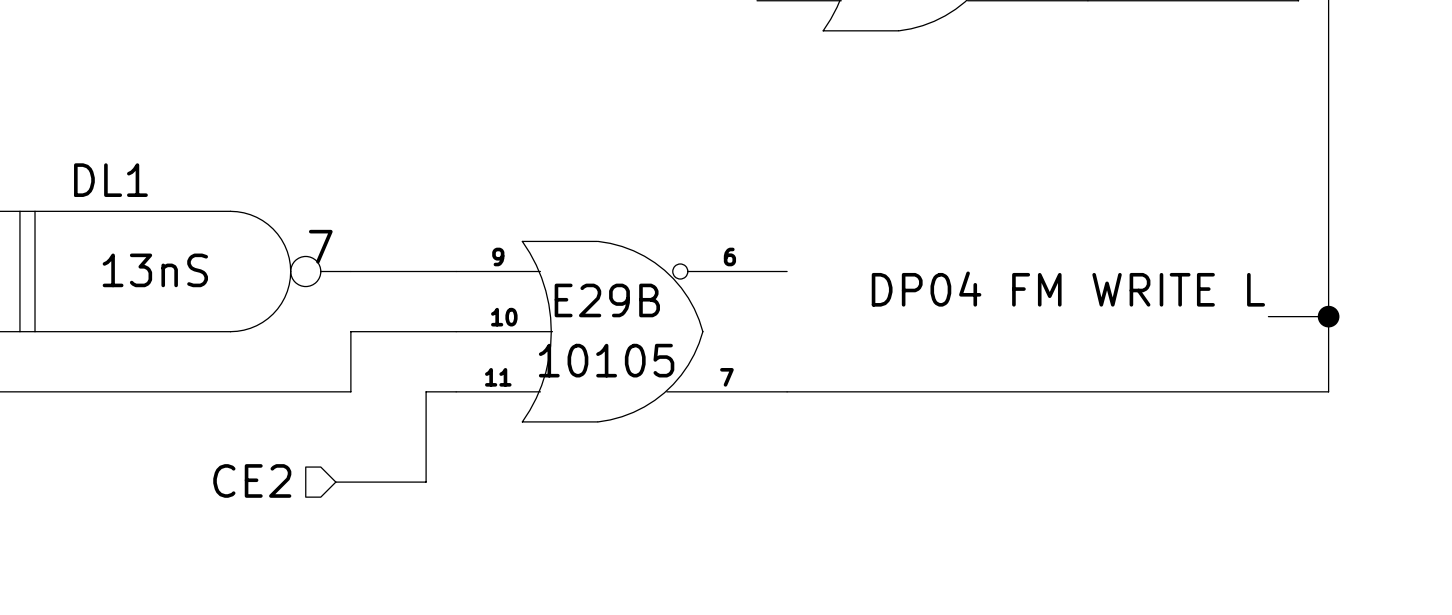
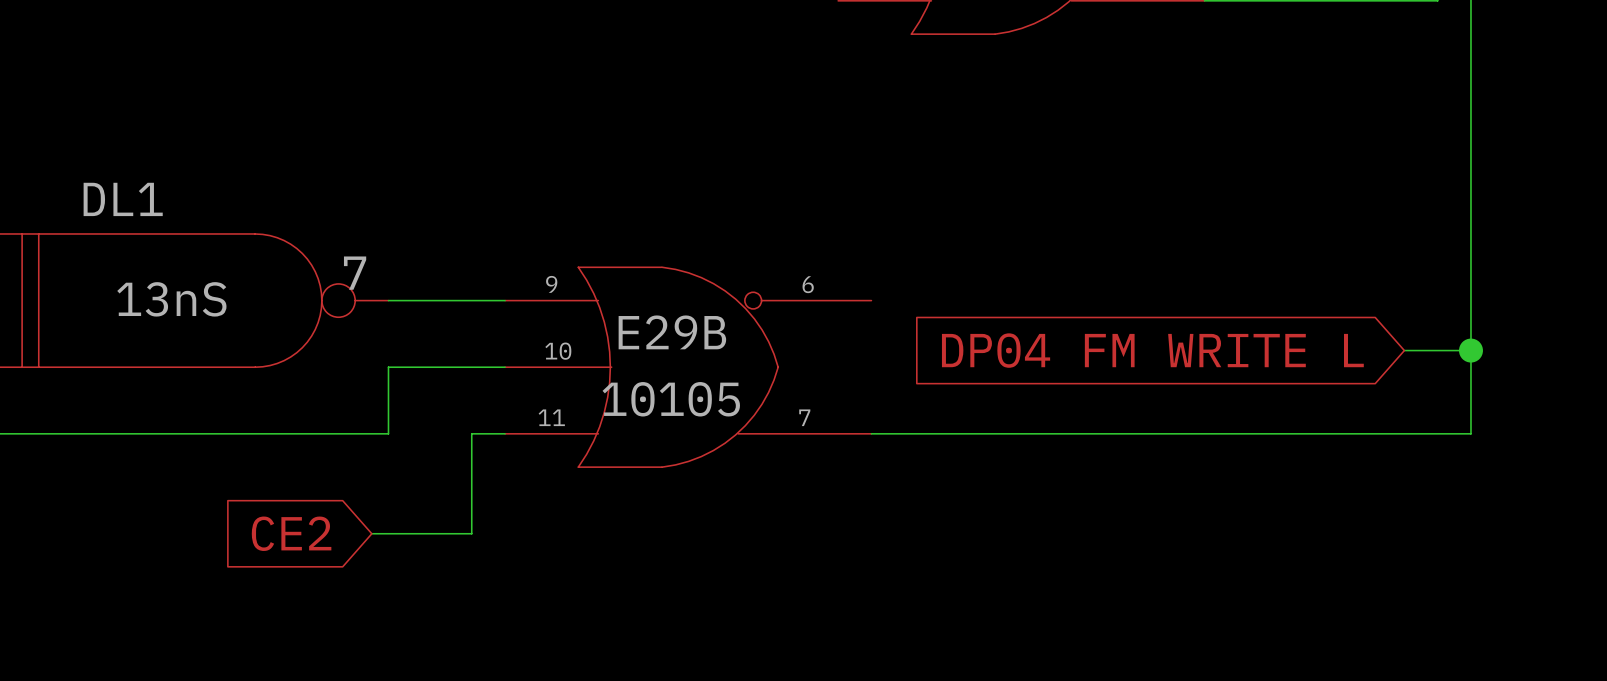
label: DP04 FM WRITE L (1068, 289) -> none
global label: none -> DP04 FM WRITE L (1152, 350)
hierarchical label: CE2 (252, 480) -> none
global label: none -> CE2 (291, 533)

